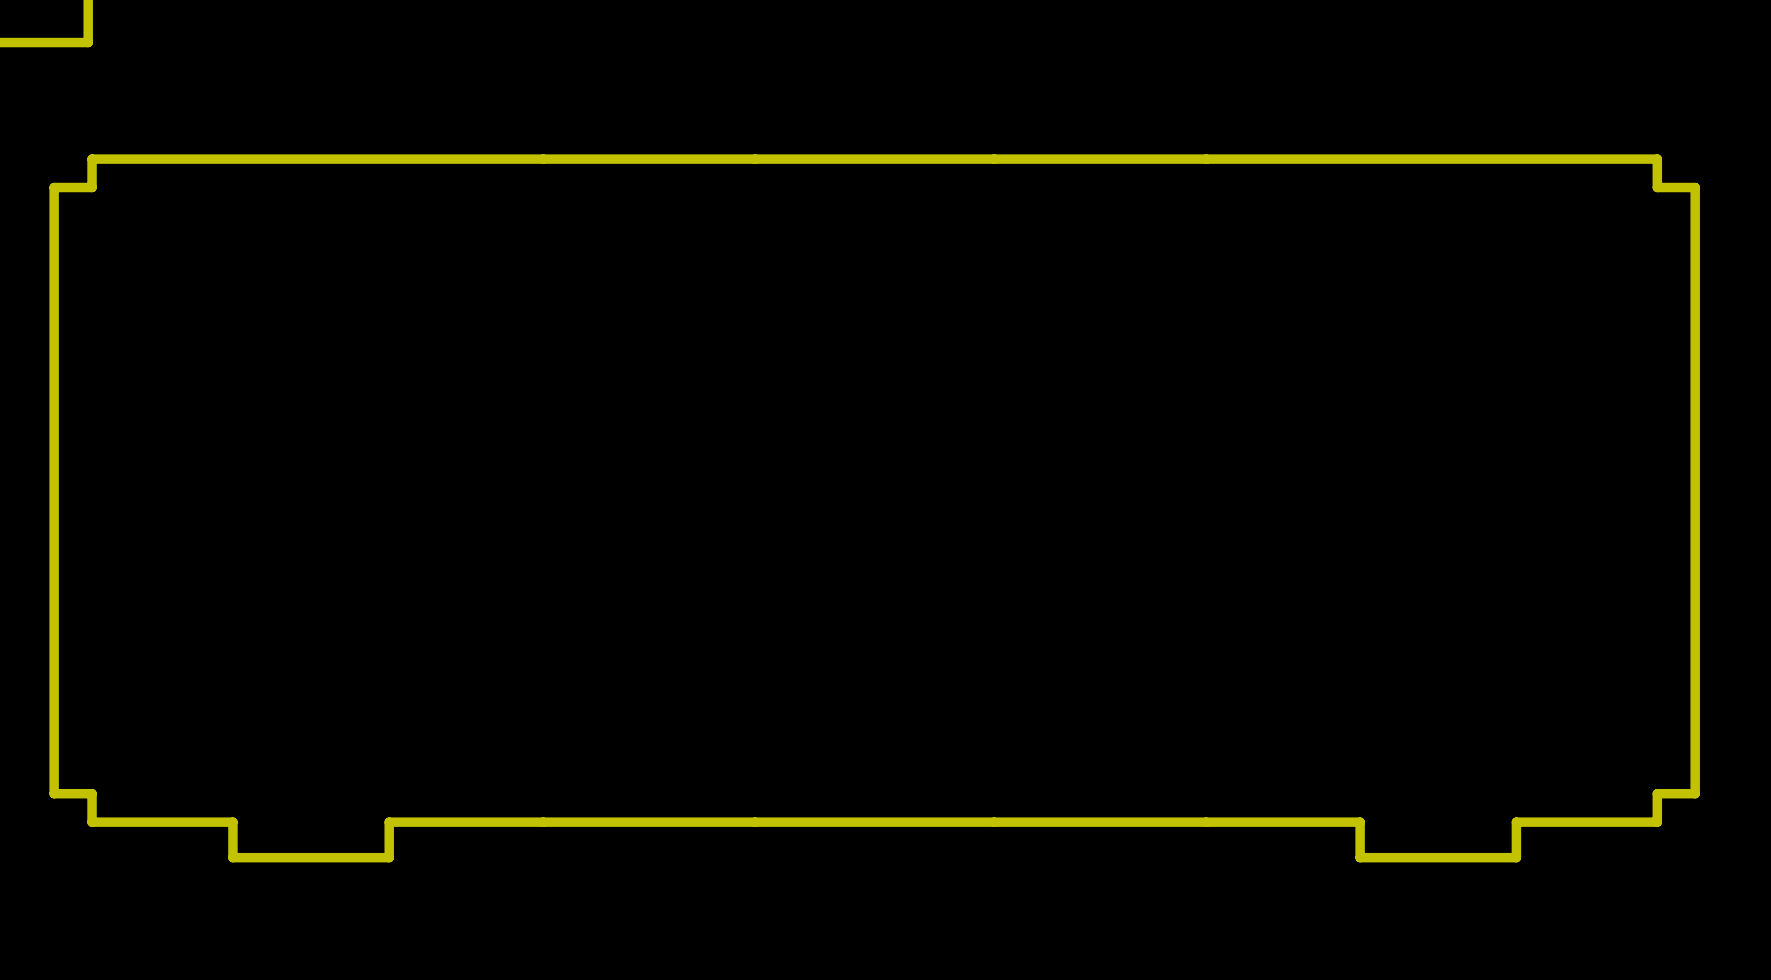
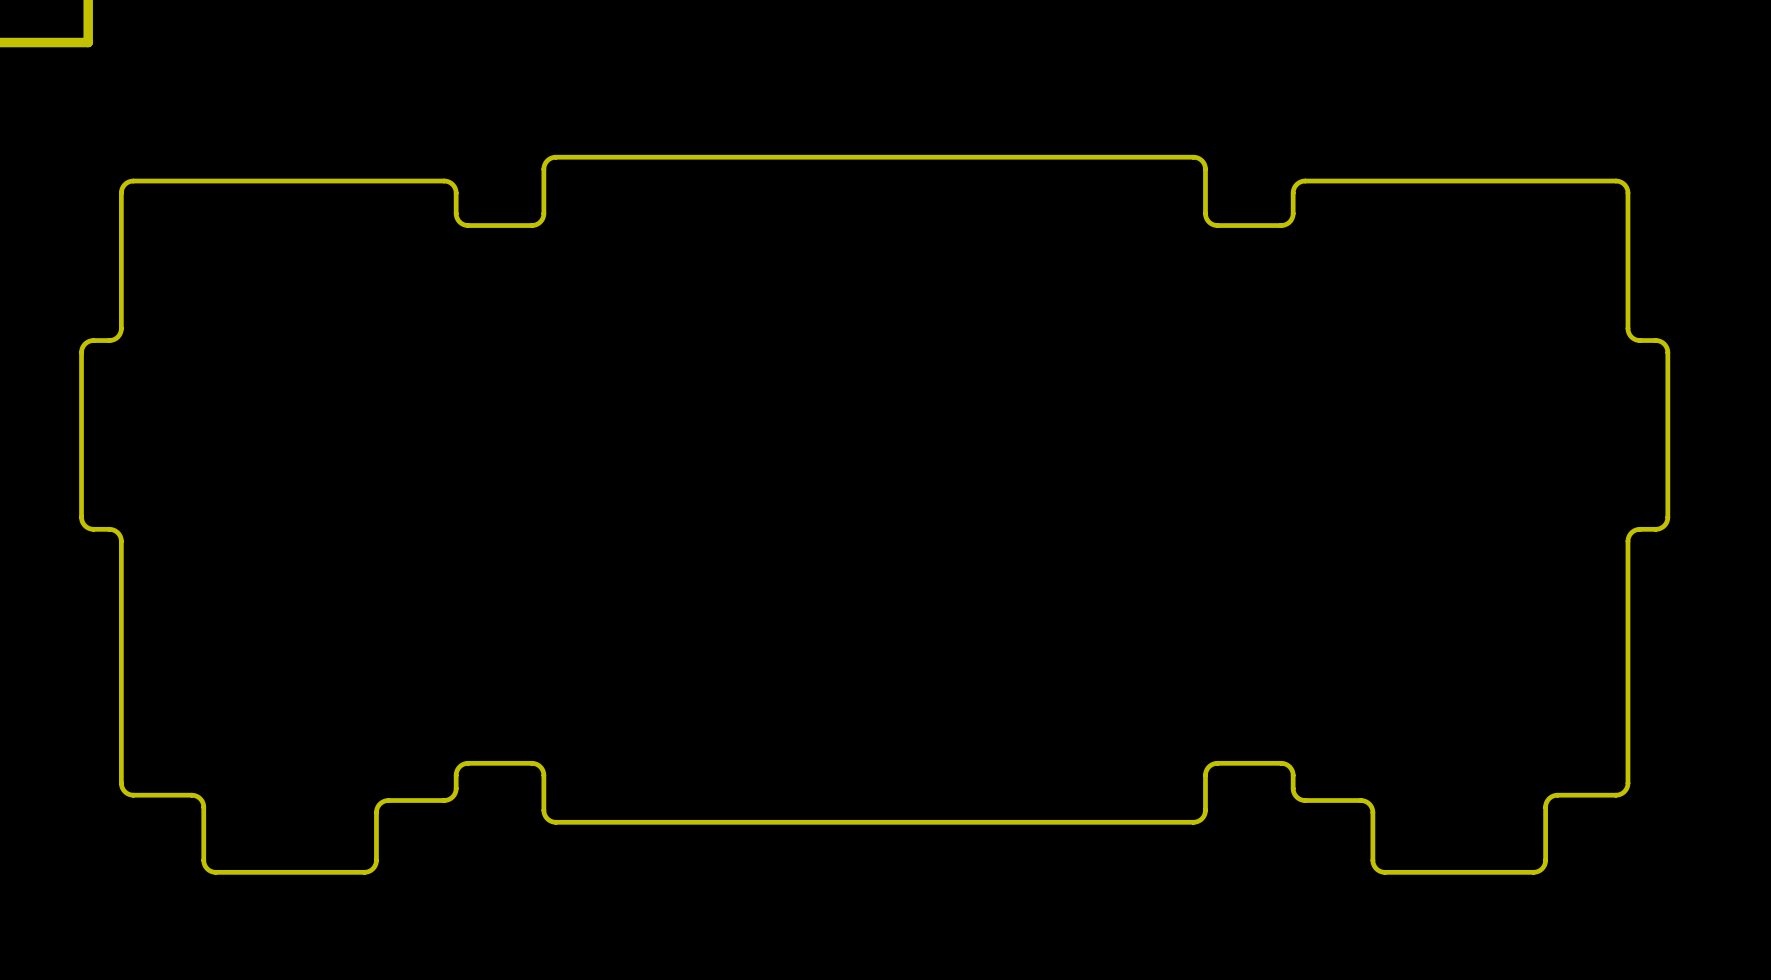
drawing shape: [49, 154, 1700, 863] -> [79, 154, 1671, 875]

